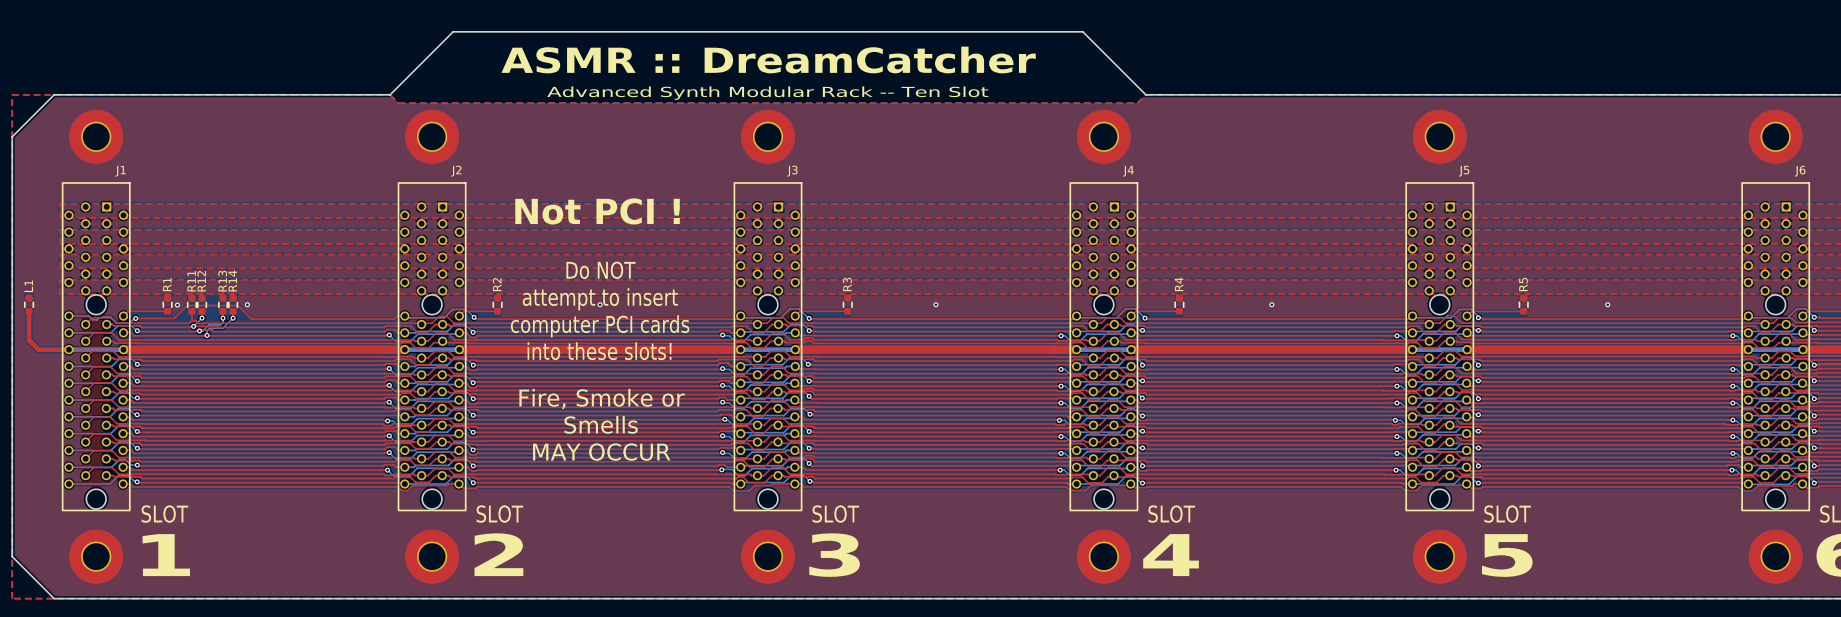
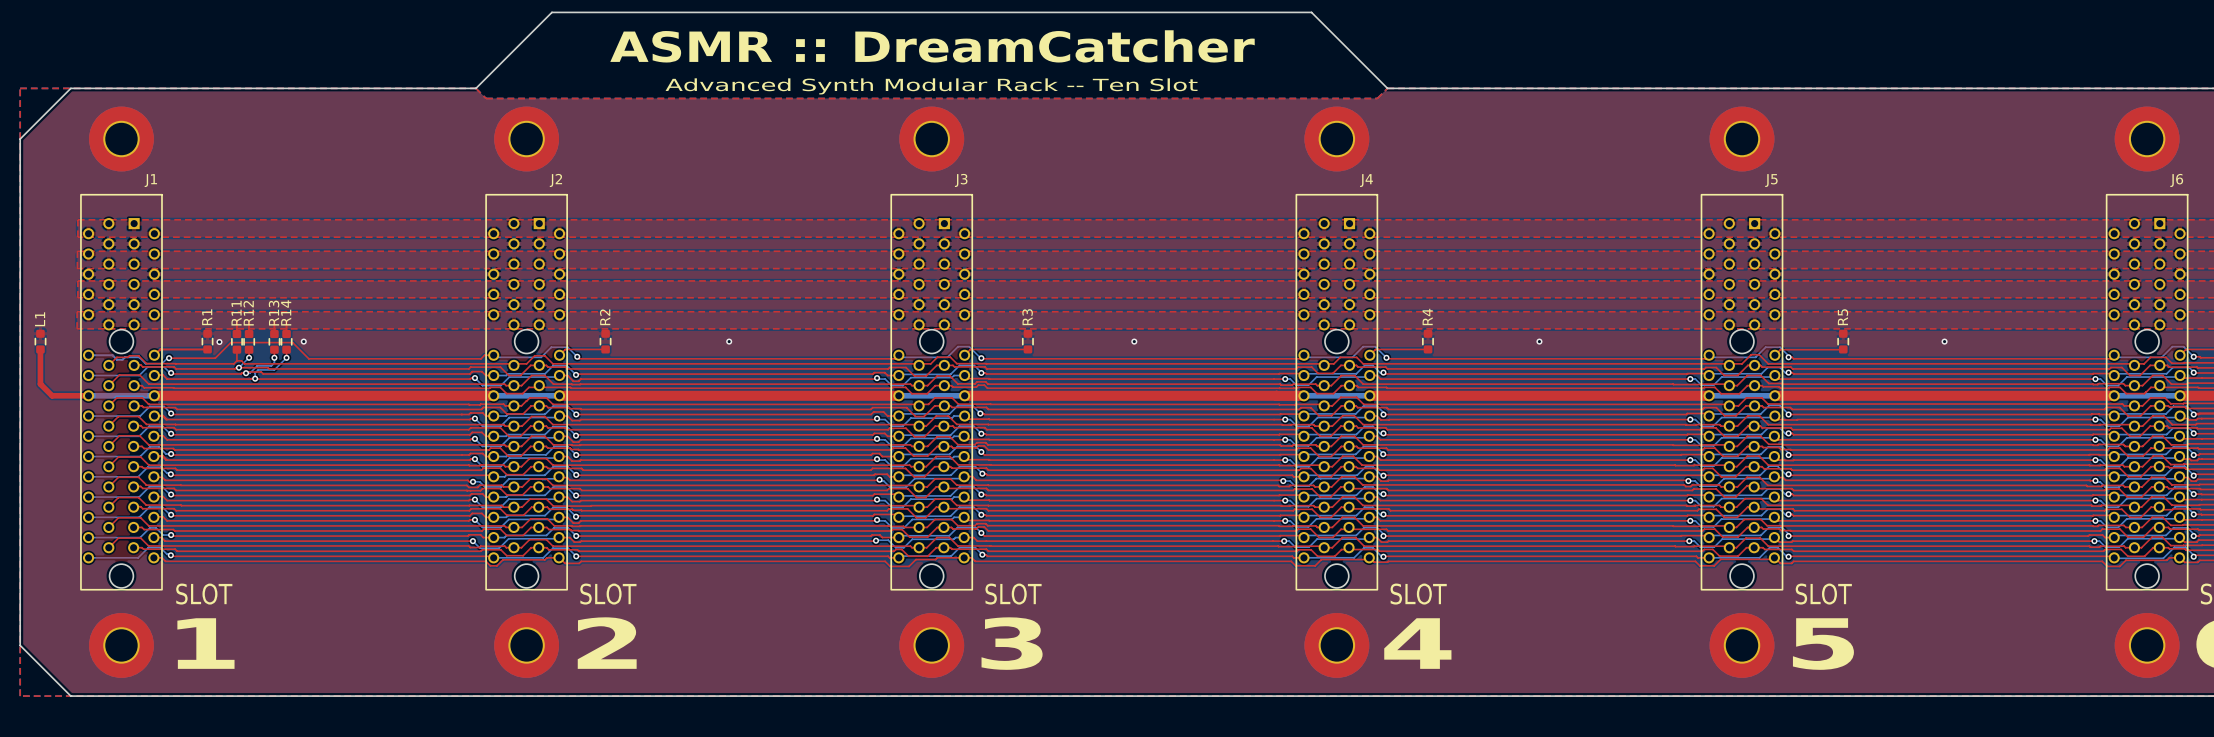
text: Not PCI ! (597, 211) -> none
text: Do NOT (600, 270) -> none
text: attempt to insert (600, 299) -> none
text: computer PCI cards (600, 326) -> none
text: into these slots! (599, 351) -> none
text: Fire, Smoke or (602, 398) -> none
text: Smells (601, 424) -> none
text: MAY OCCUR (601, 452) -> none

